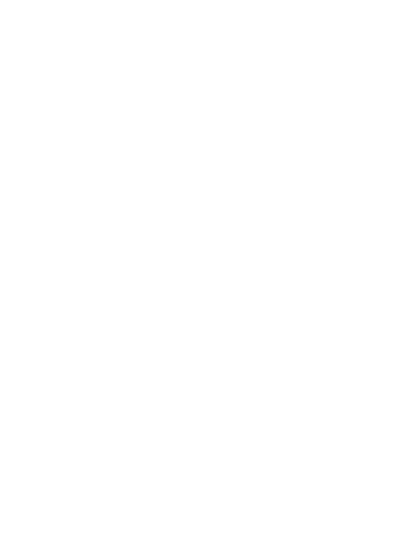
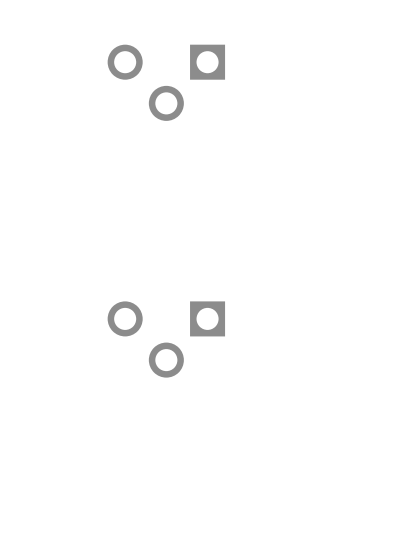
part: none -> (166, 82)
part: none -> (166, 339)

